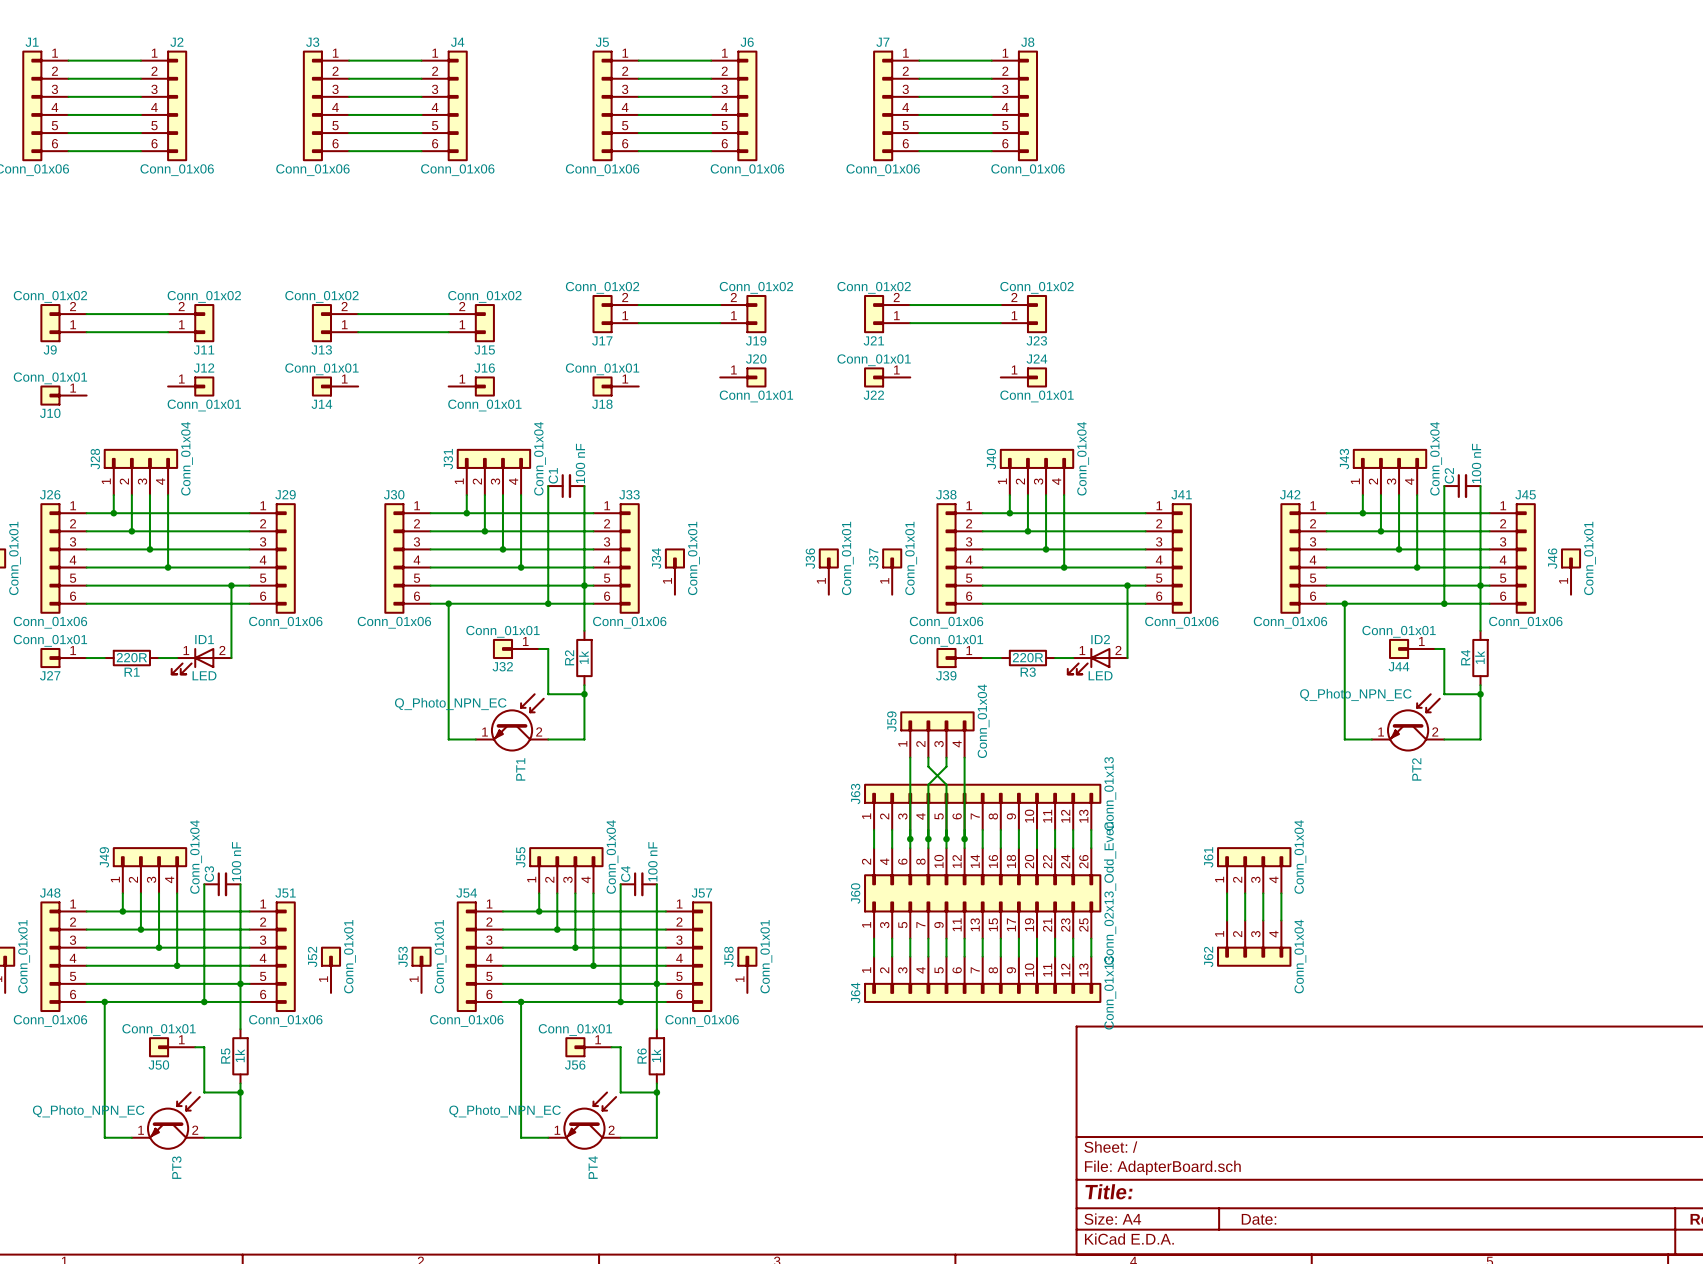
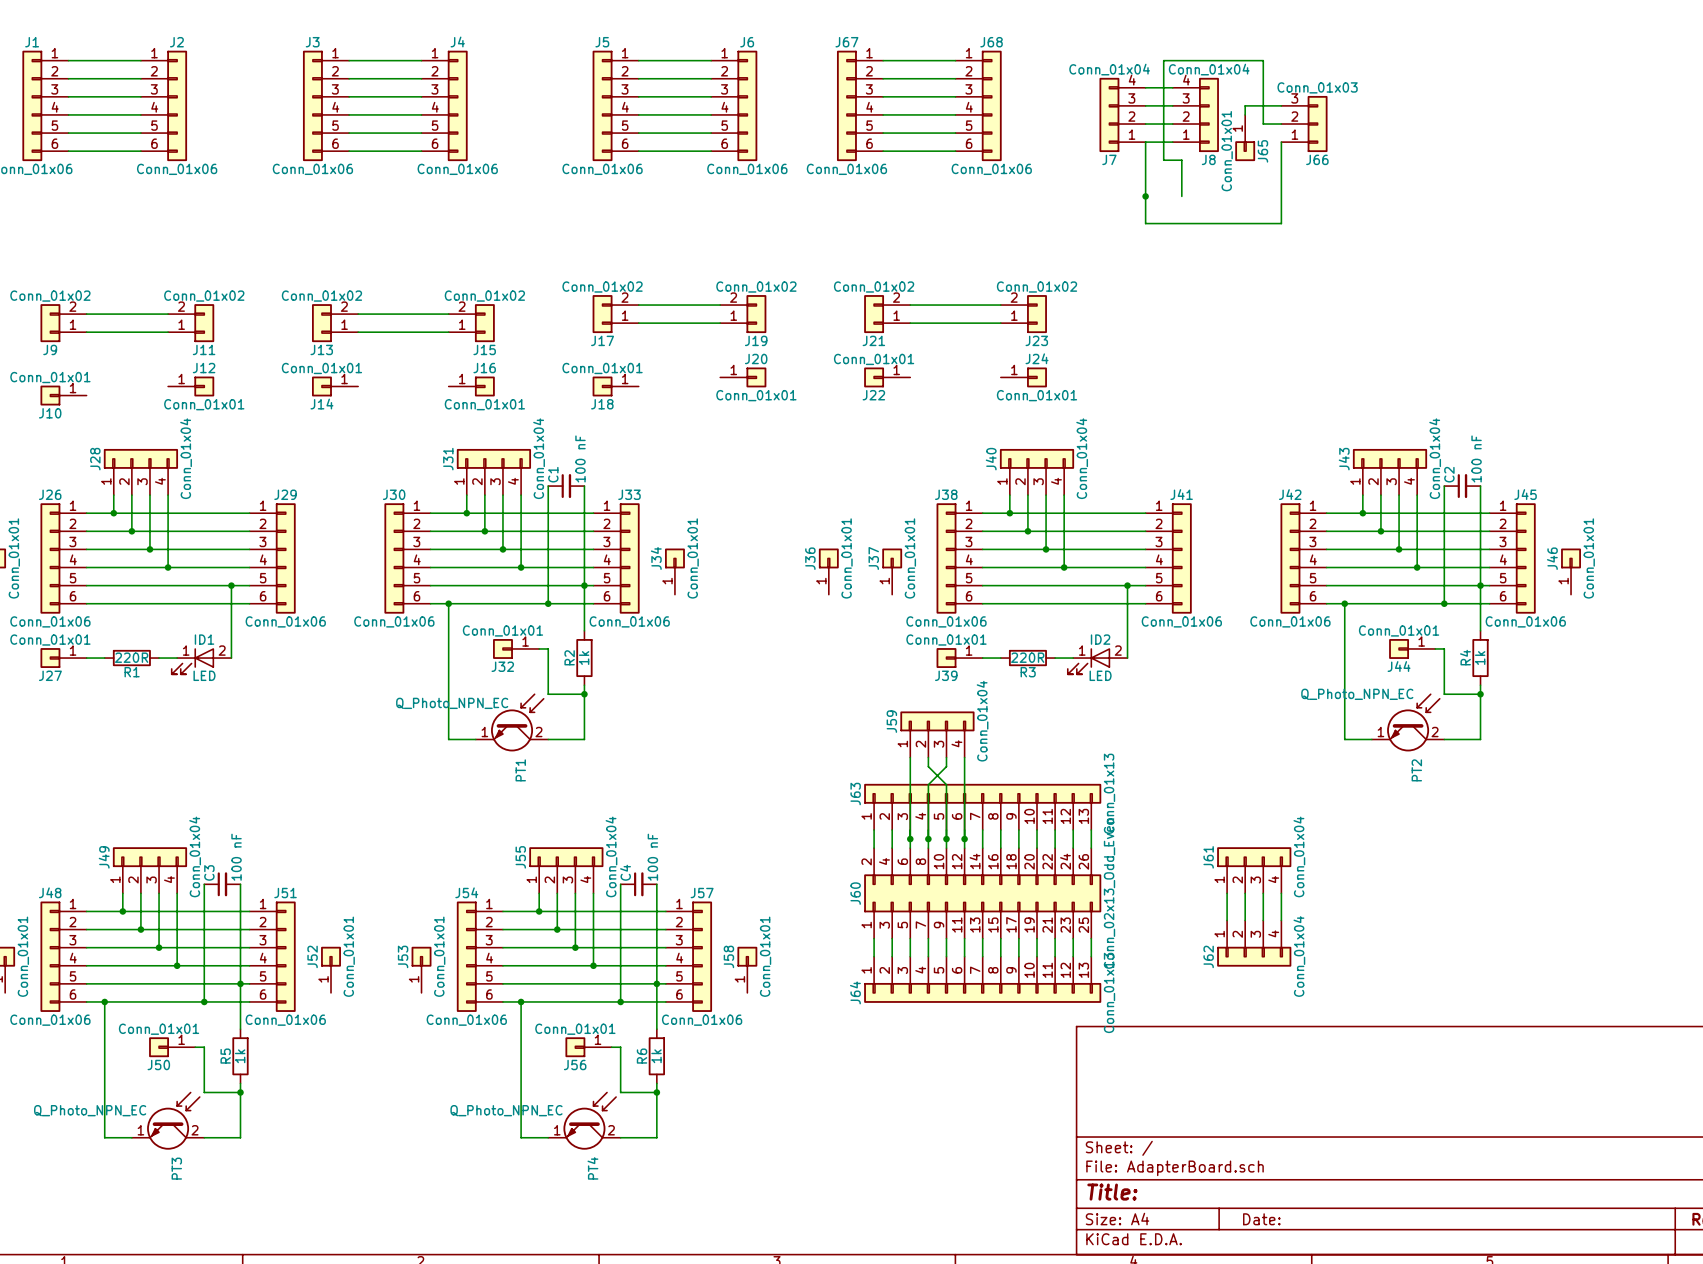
J7 name position: J7 (882, 42) -> J7 (1109, 159)
J8 name position: J8 (1027, 42) -> J8 (1208, 159)
J7 symbol: [873, 50, 920, 162] -> [1099, 77, 1146, 153]
J8 symbol: [991, 50, 1038, 162] -> [1172, 77, 1219, 153]
wire: none -> (1145, 87) (1172, 87)
J67: none -> Conn_01x06 (860, 105)
J68: none -> Conn_01x06 (978, 105)
wire: none -> (1145, 105) (1172, 105)
wire: none -> (1281, 105) (1245, 105) (1245, 114)
wire: none -> (1145, 124) (1172, 124)
wire: none -> (1281, 124) (1263, 124) (1263, 60) (1163, 60) (1163, 160) (1181, 160) (1181, 196)
J66: none -> Conn_01x03 (1304, 124)
J65: none -> Conn_01x01 (1245, 138)
wire: none -> (1172, 142) (1145, 142) (1145, 223) (1281, 223) (1281, 142)
J7 value: Conn_01x06 (883, 170) -> Conn_01x04 (1109, 69)
J8 value: Conn_01x06 (1027, 170) -> Conn_01x04 (1209, 69)
junction: none -> (1145, 196)

